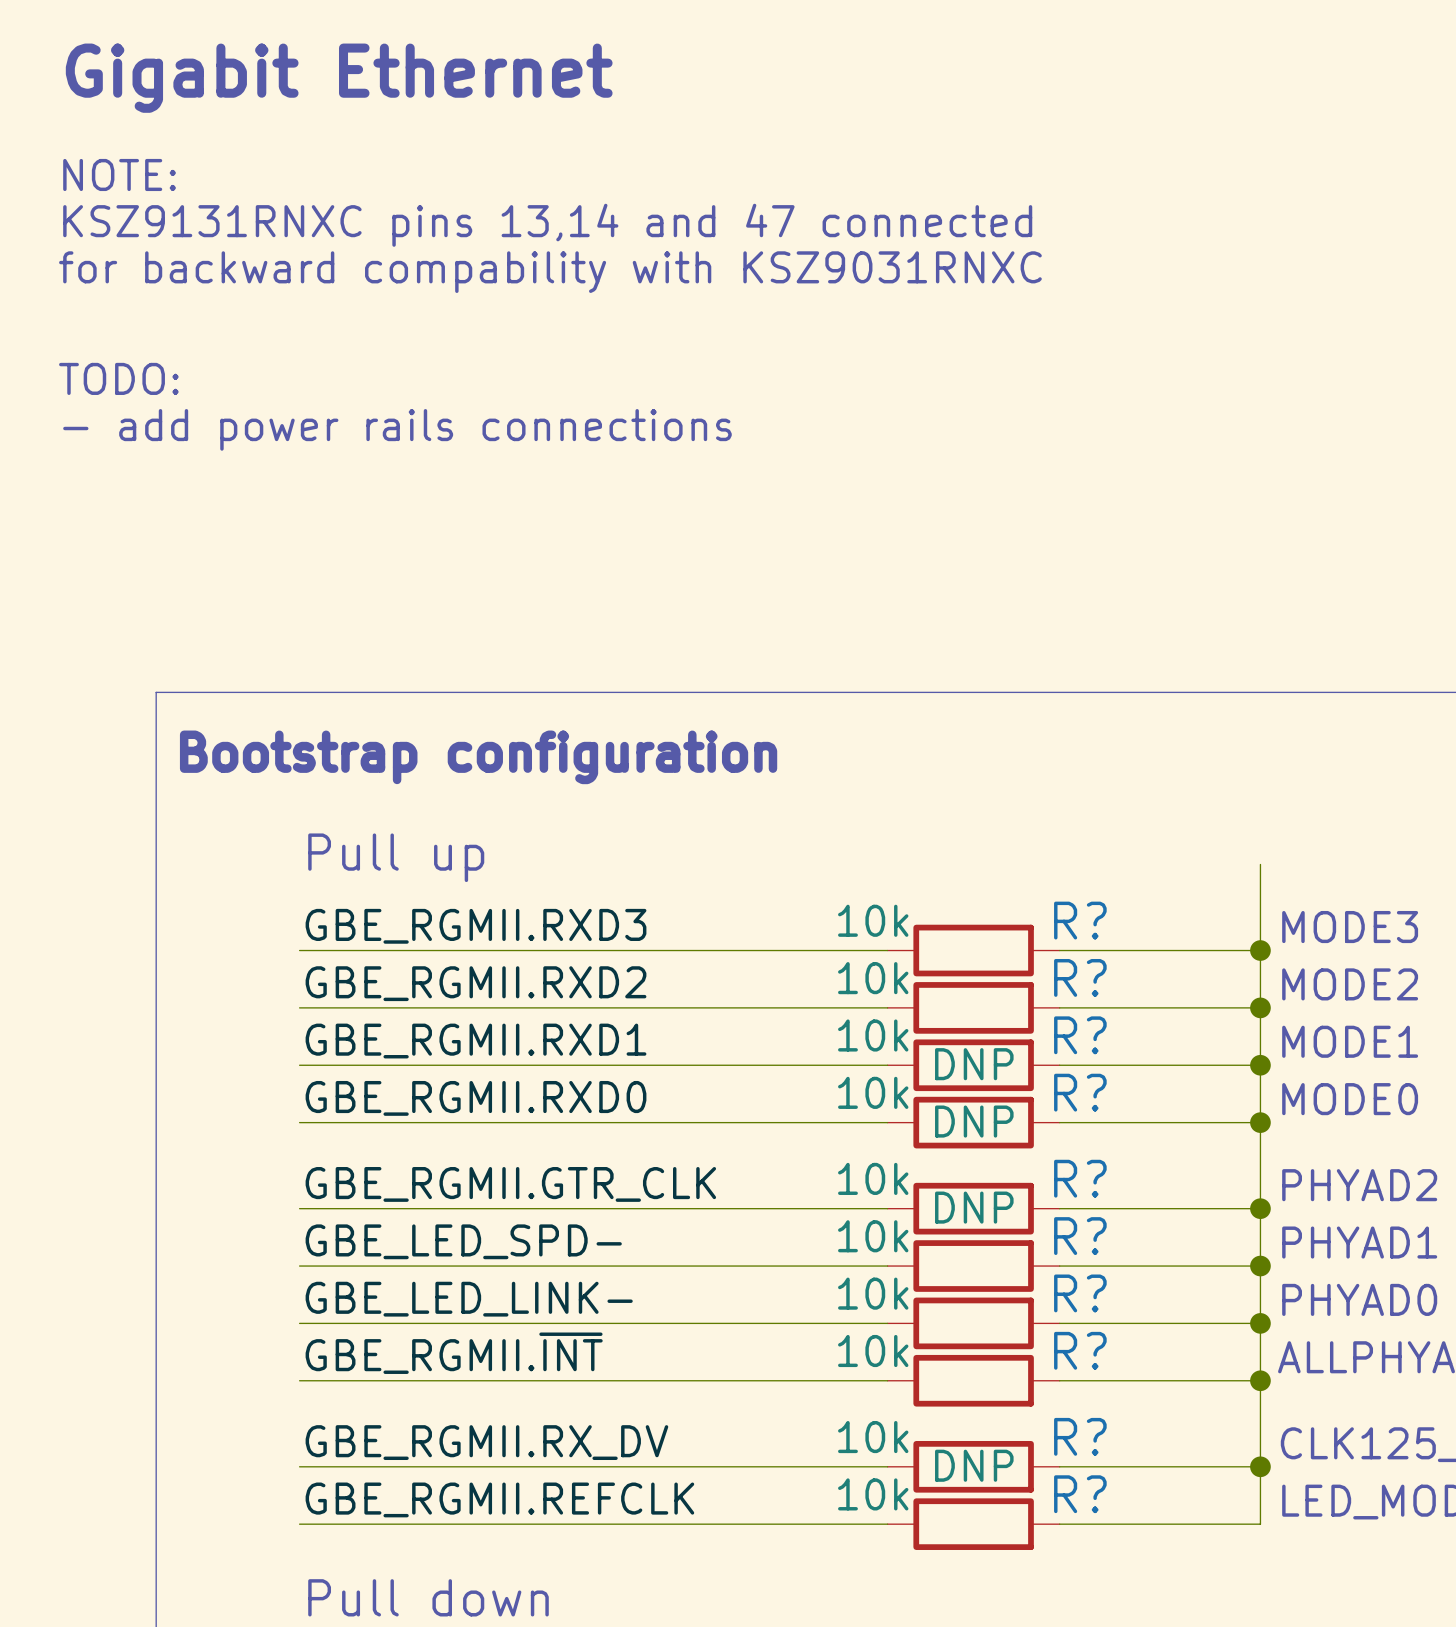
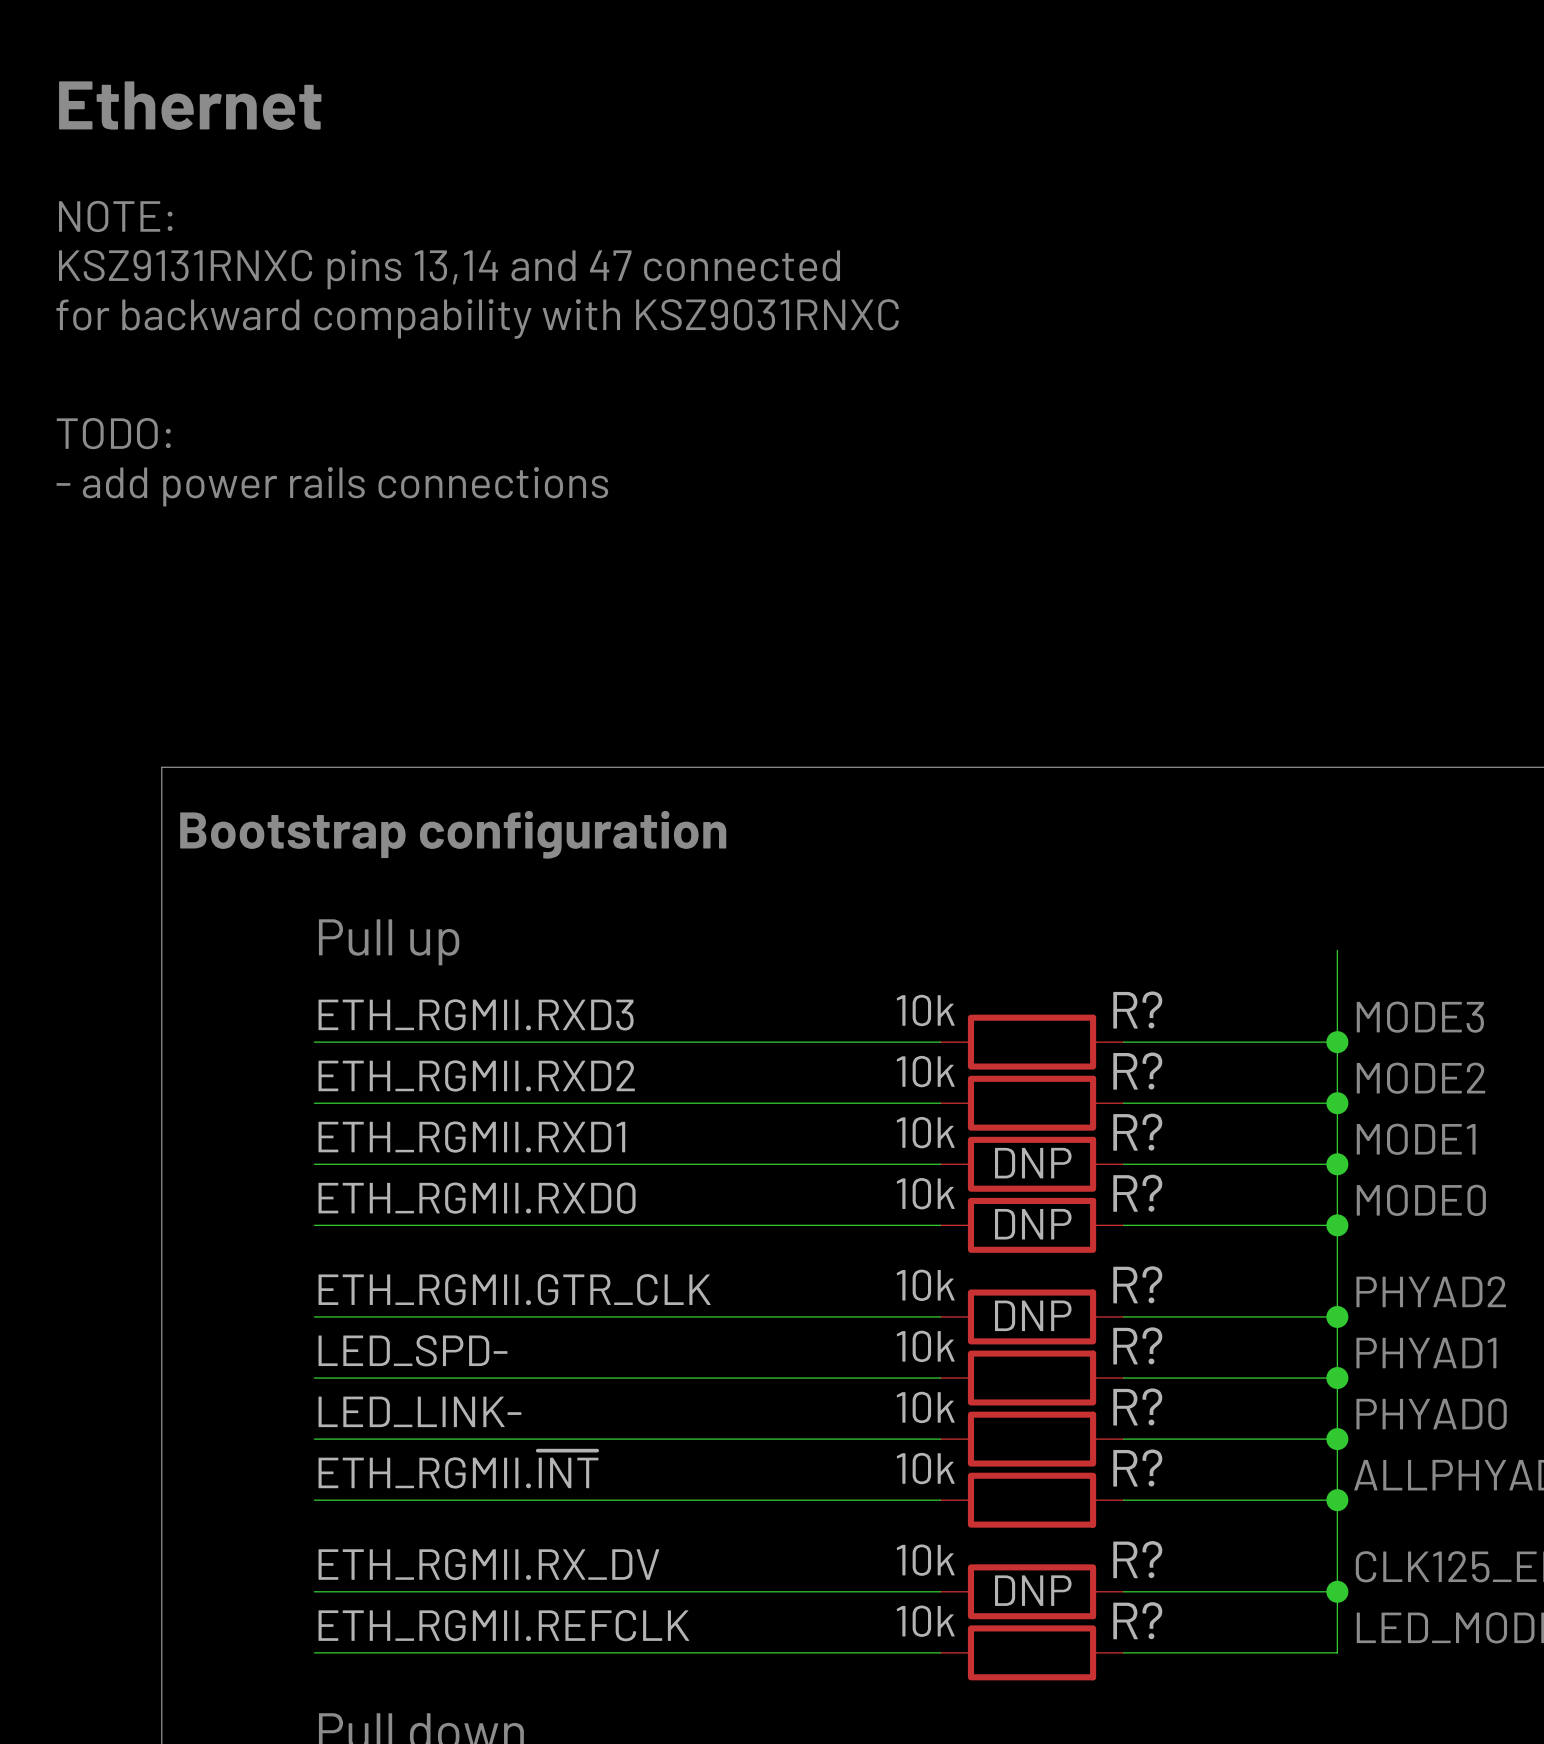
text: Gigabit Ethernet (339, 78) -> Ethernet (190, 105)
label: GBE_RGMII.RXD3 (476, 926) -> ETH_RGMII.RXD3 (476, 1014)
label: GBE_RGMII.RXD2 (476, 983) -> ETH_RGMII.RXD2 (476, 1075)
label: GBE_RGMII.RXD1 (476, 1041) -> ETH_RGMII.RXD1 (471, 1137)
label: GBE_RGMII.RXD0 (476, 1098) -> ETH_RGMII.RXD0 (477, 1198)
label: GBE_RGMII.GTR_CLK (510, 1184) -> ETH_RGMII.GTR_CLK (514, 1289)
label: GBE_LED_SPD- (463, 1241) -> LED_SPD- (412, 1350)
label: GBE_LED_LINK- (469, 1299) -> LED_LINK- (419, 1411)
label: GBE_RGMII.~{INT} (454, 1353) -> ETH_RGMII.~{INT} (458, 1469)
label: GBE_RGMII.RX_DV (486, 1442) -> ETH_RGMII.RX_DV (488, 1564)
label: GBE_RGMII.REFCLK (499, 1499) -> ETH_RGMII.REFCLK (503, 1625)

